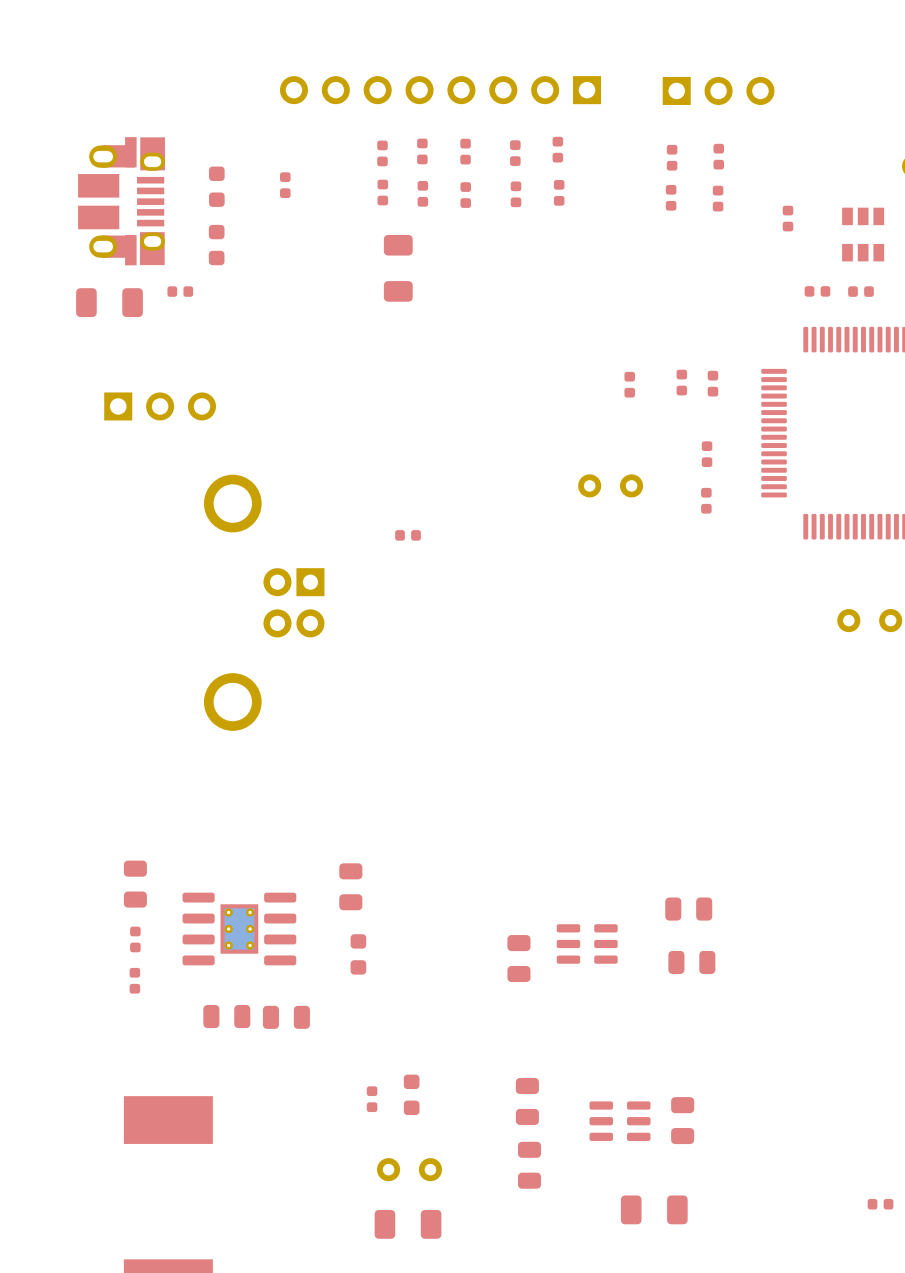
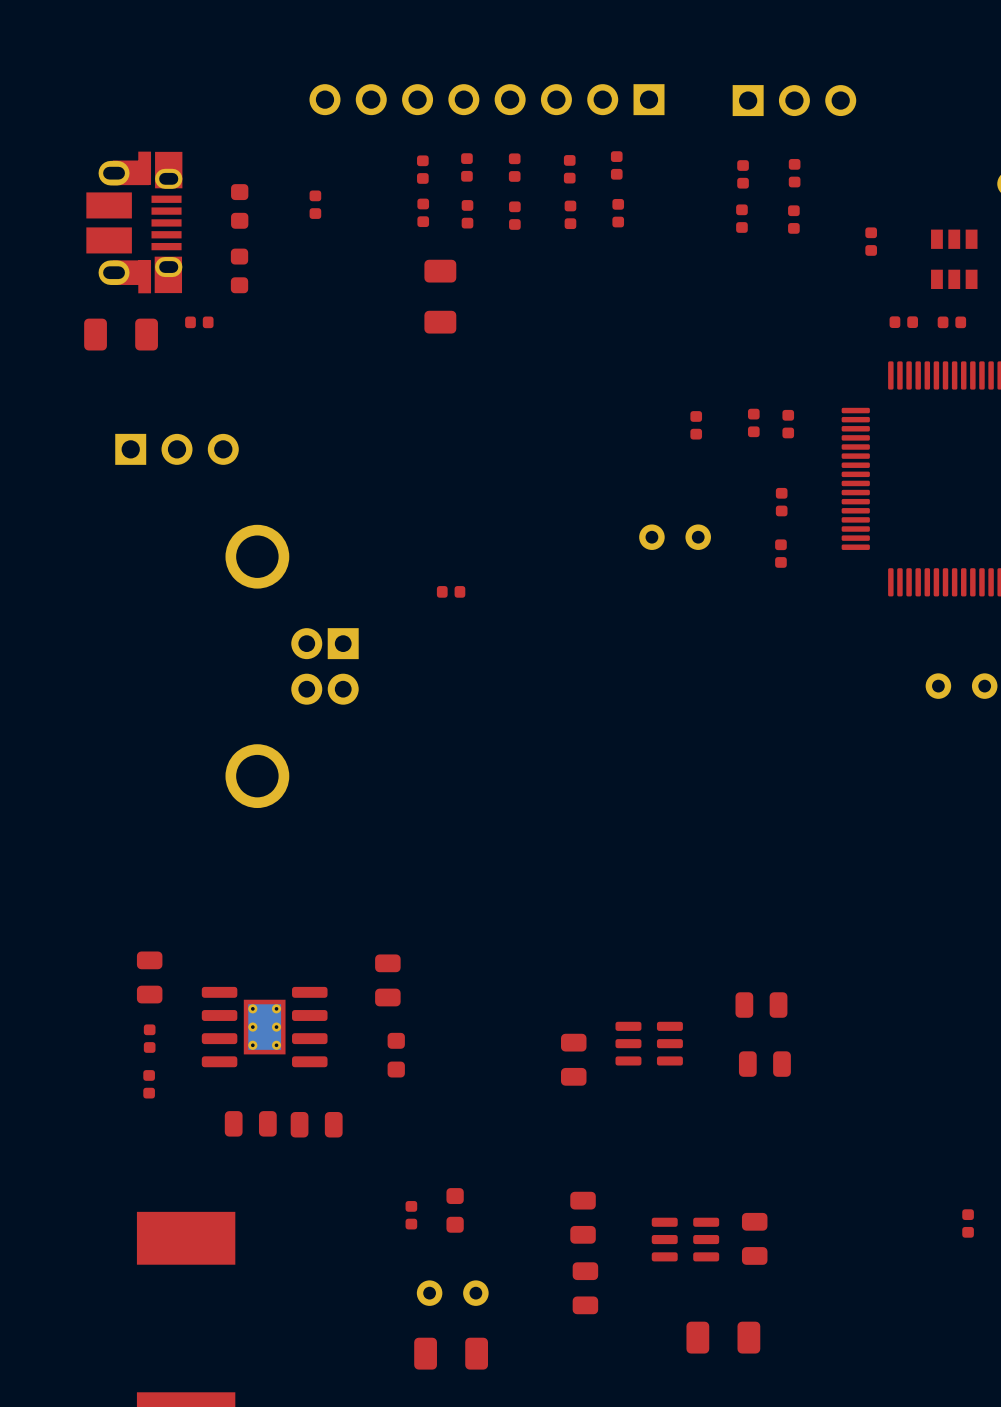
part rotation: 0° (880, 1204) -> 90° clockwise (968, 1223)
part position: (880, 1204) -> (968, 1223)

